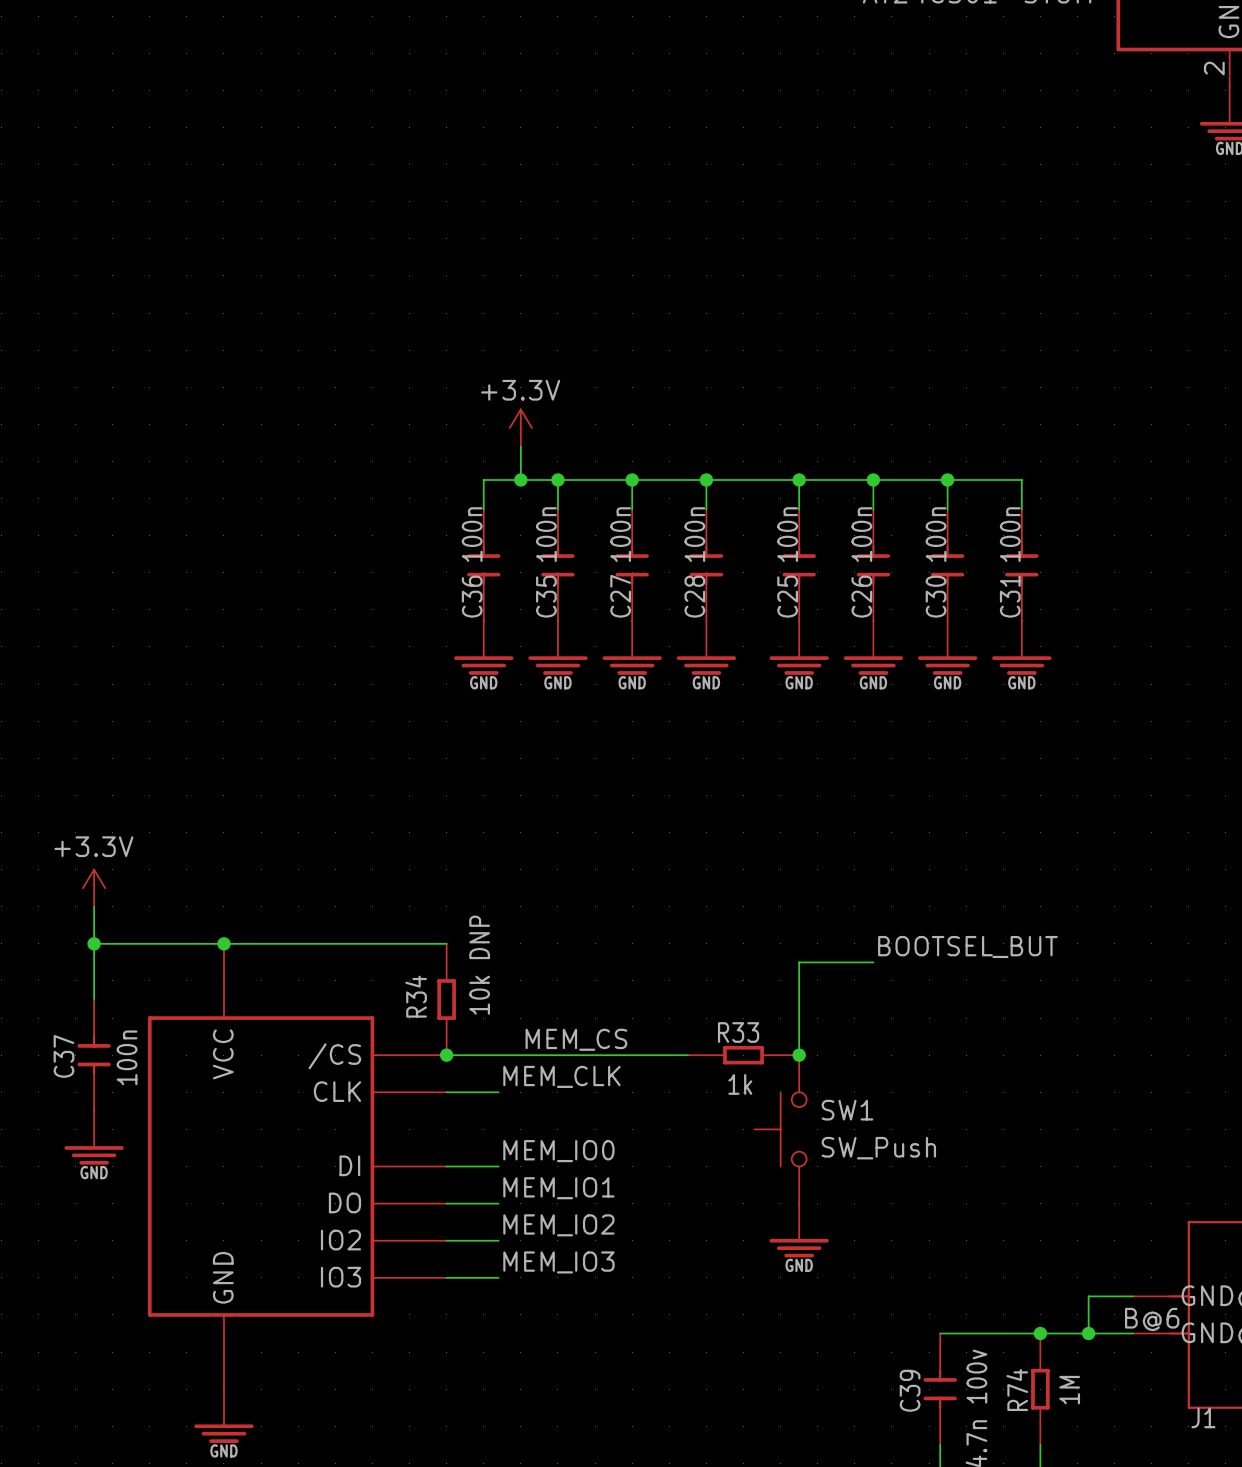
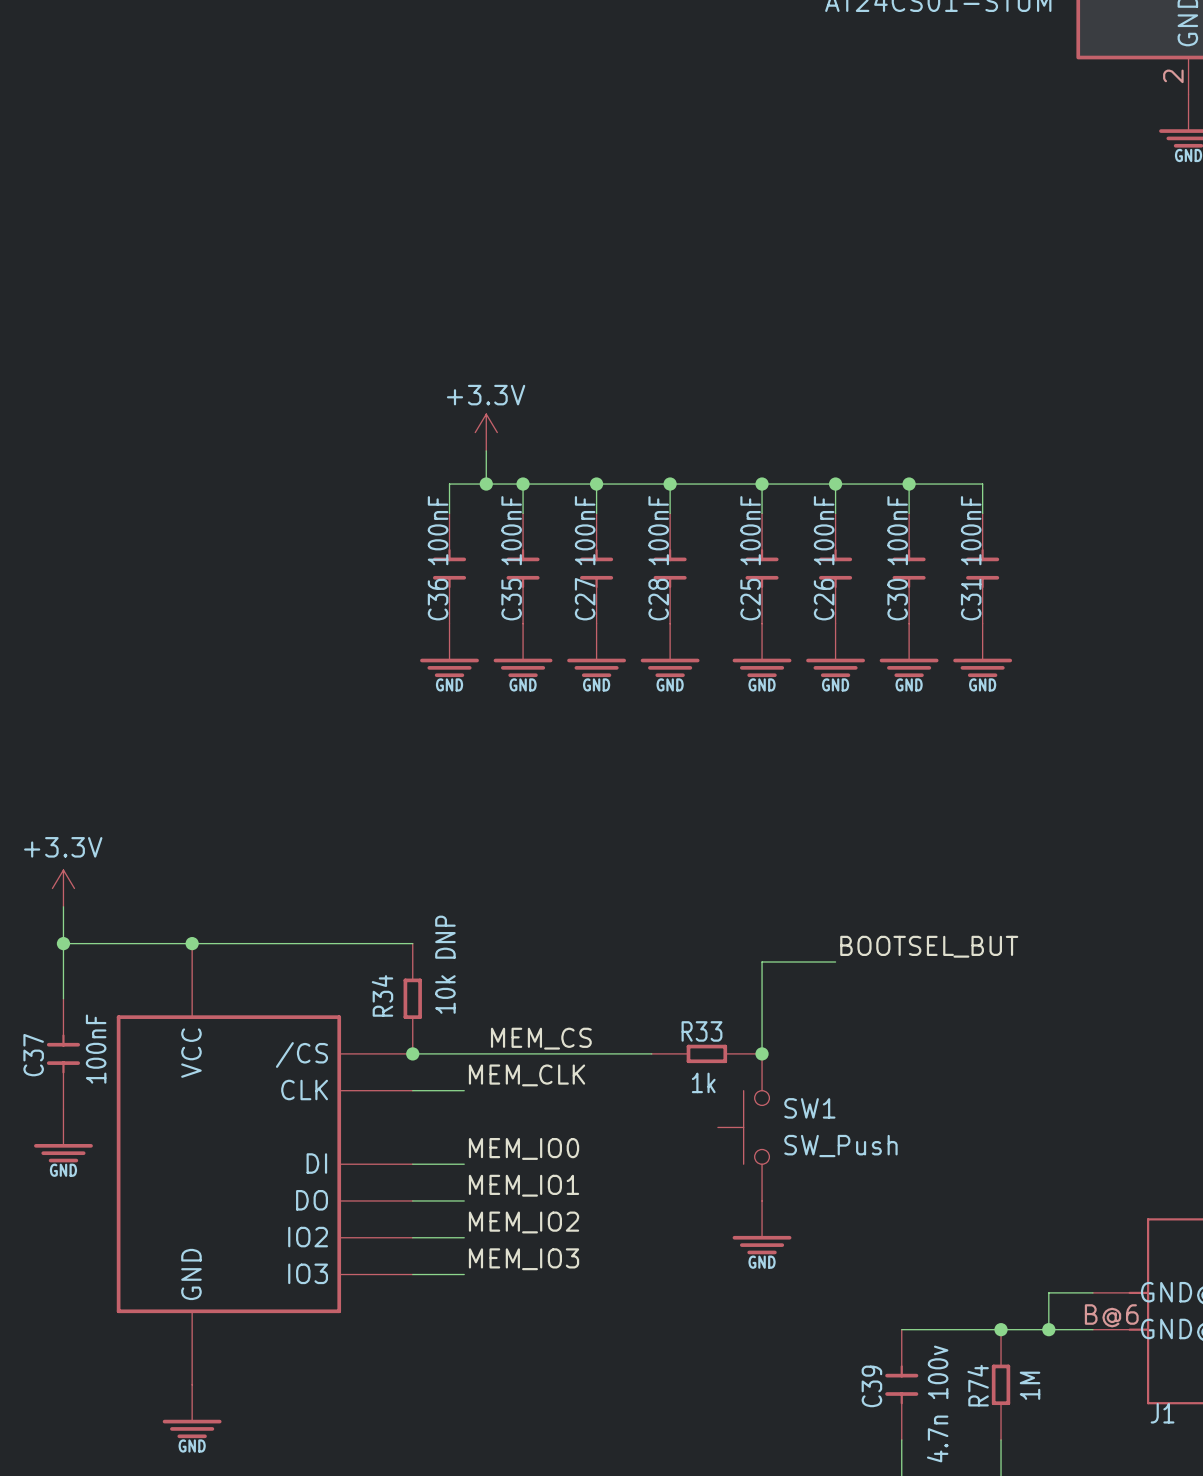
C36 value: 100n (472, 534) -> 100nF (438, 530)
C35 value: 100n (546, 534) -> 100nF (511, 530)
C27 value: 100n (620, 534) -> 100nF (585, 530)
C28 value: 100n (694, 534) -> 100nF (658, 530)
C25 value: 100n (787, 534) -> 100nF (750, 530)
C26 value: 100n (861, 534) -> 100nF (824, 530)
C30 value: 100n (936, 534) -> 100nF (897, 530)
C31 value: 100n (1010, 534) -> 100nF (971, 530)
C37 value: 100n (127, 1057) -> 100nF (96, 1049)

